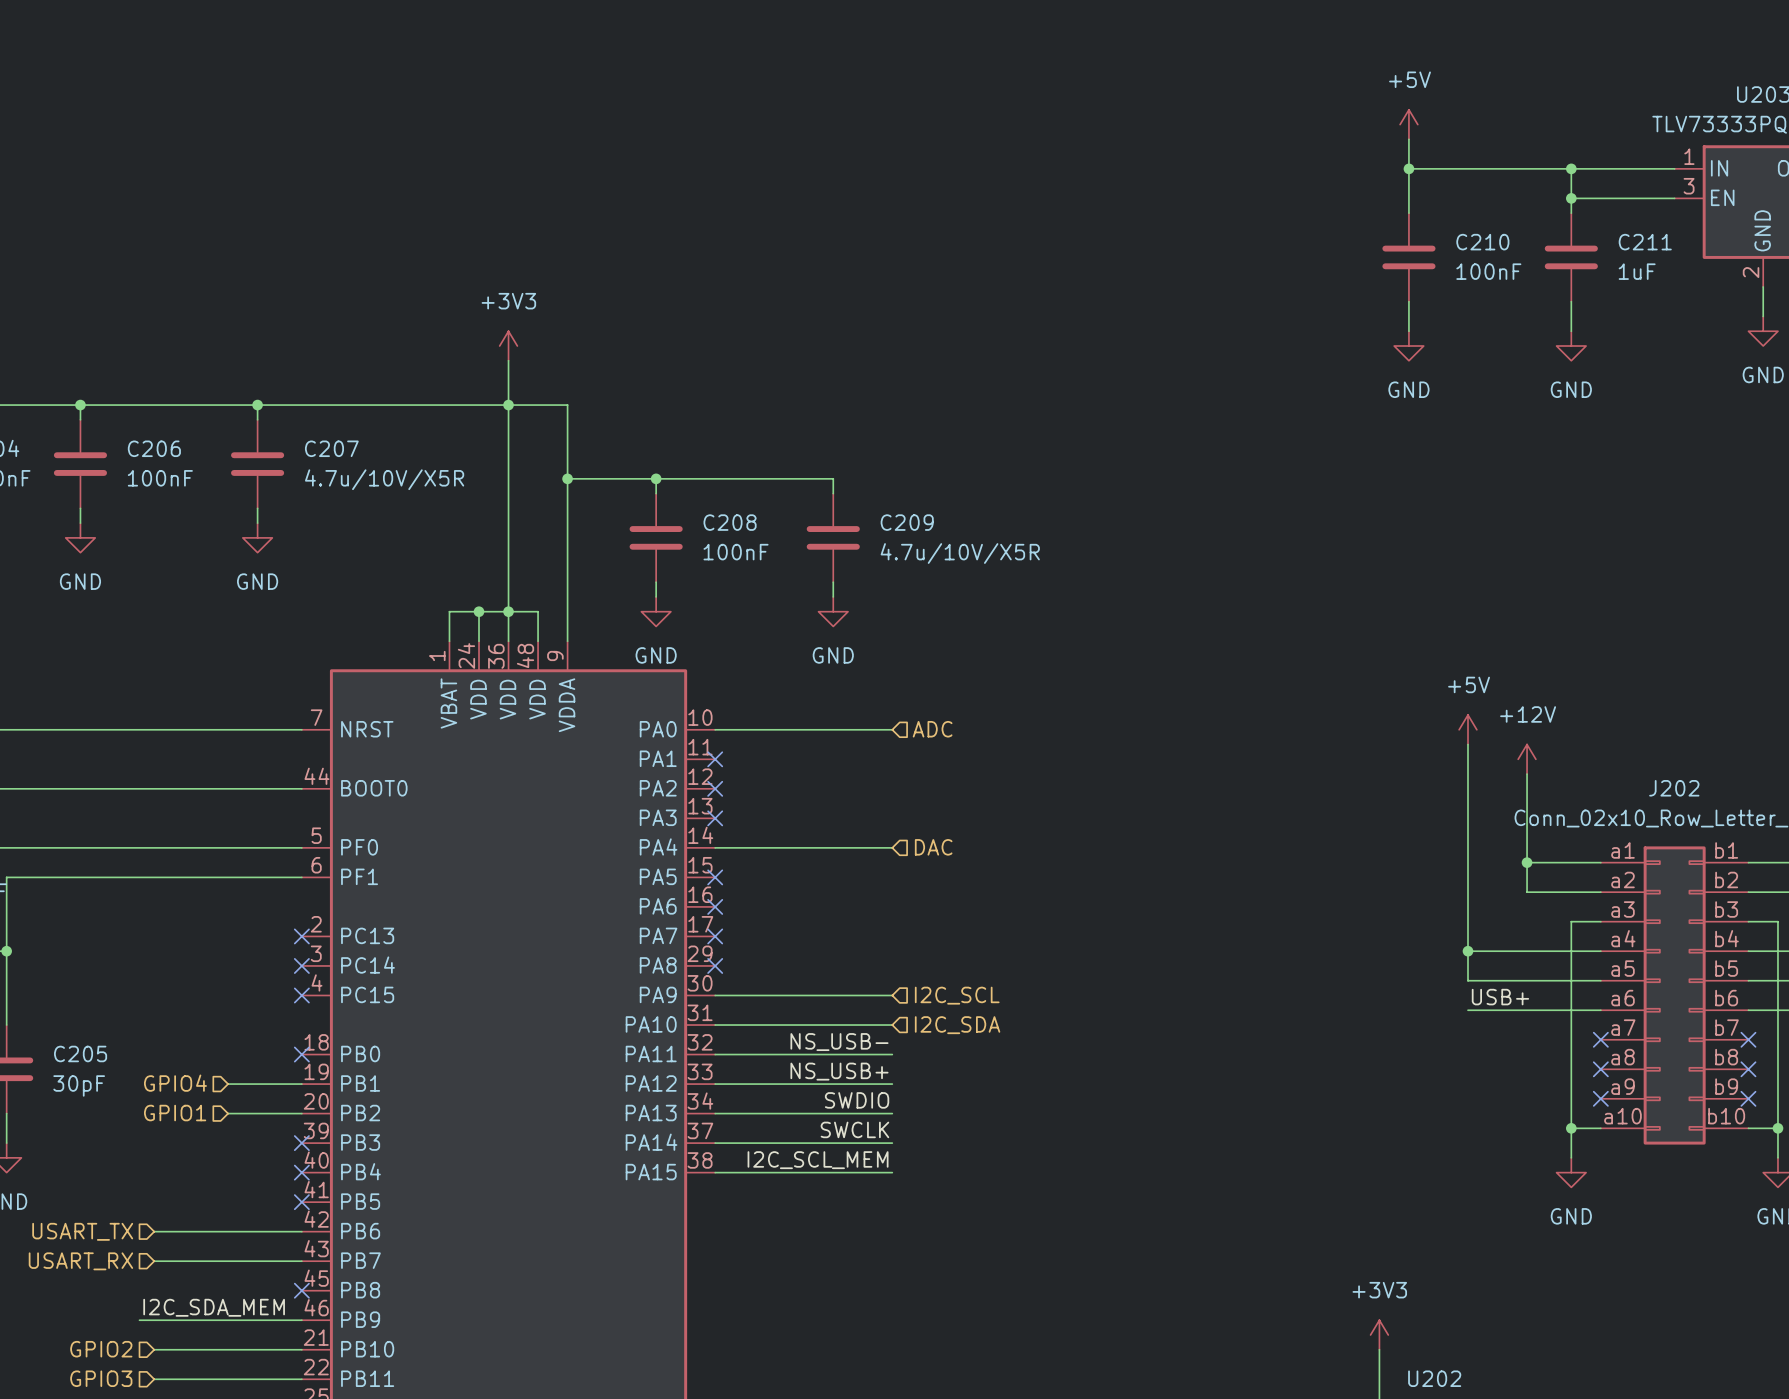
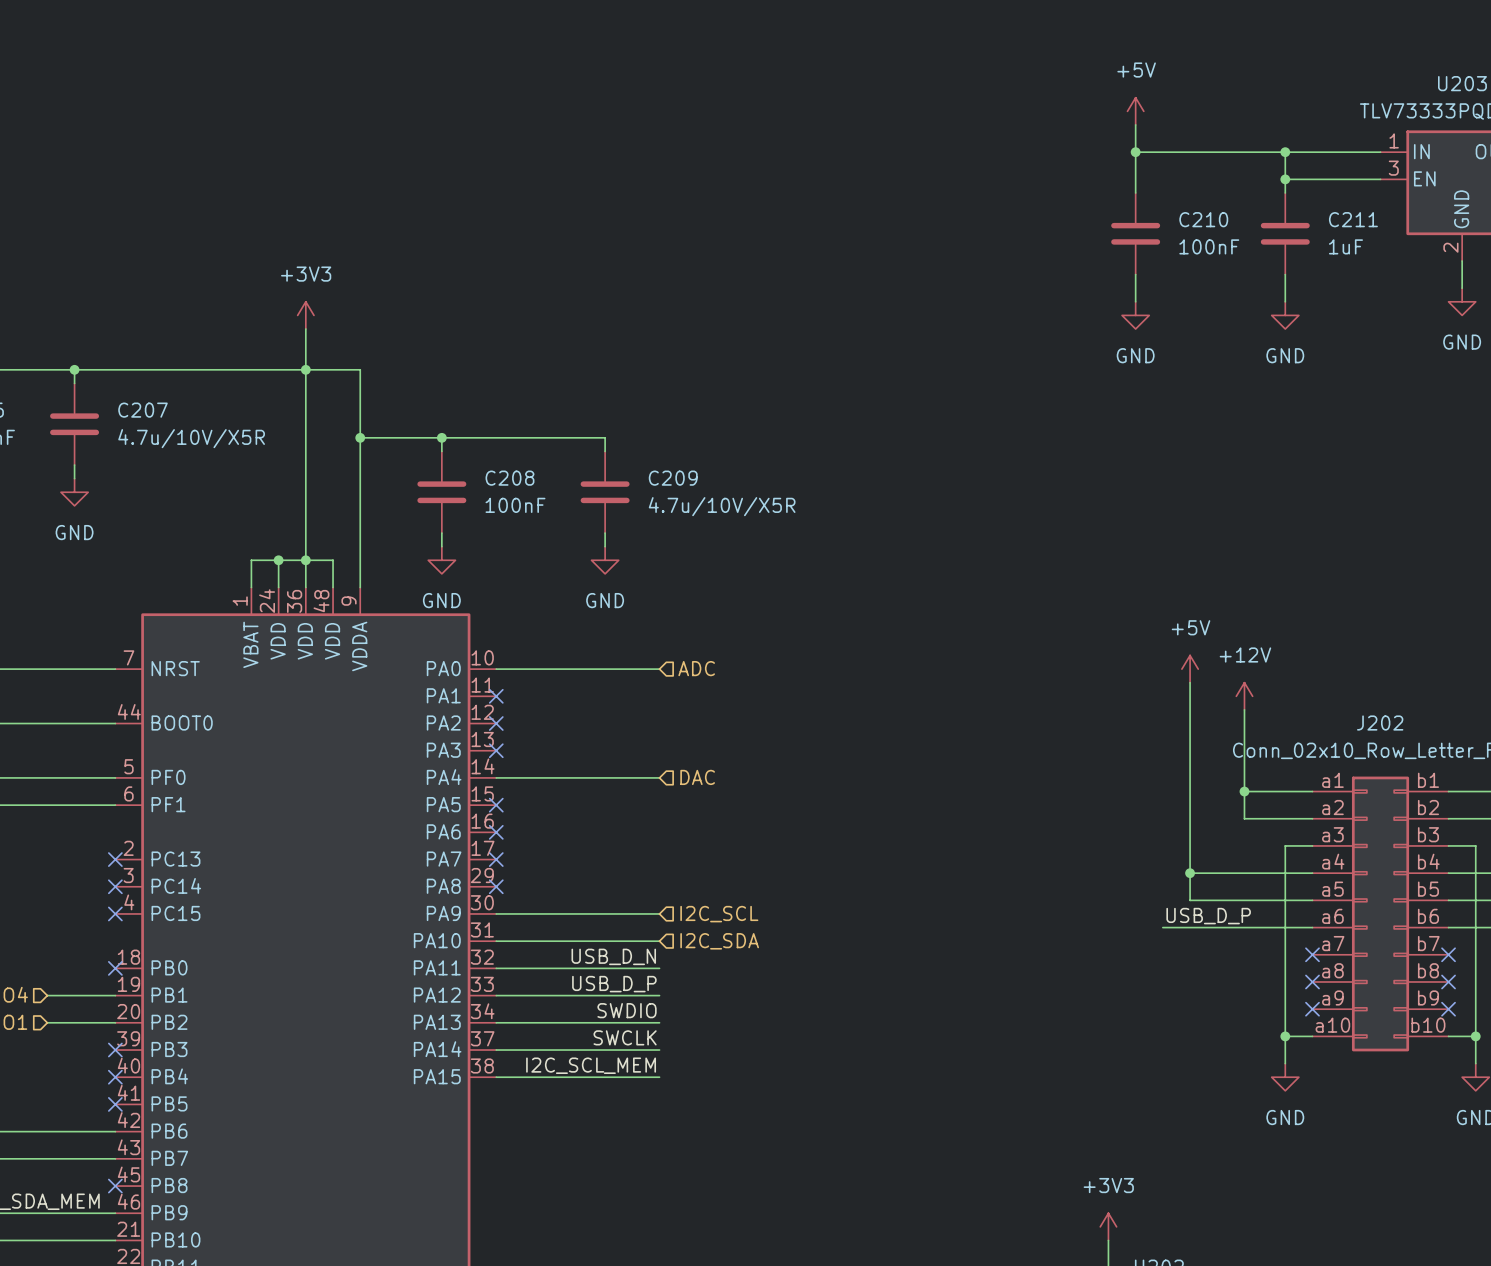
label: none -> USB_D_P (1208, 916)
label: USB+ (1500, 997) -> none
wire: none -> (1162, 927) (1190, 927)
label: NS_USB- (839, 1042) -> USB_D_N (613, 956)
label: NS_USB+ (839, 1071) -> USB_D_P (614, 984)

